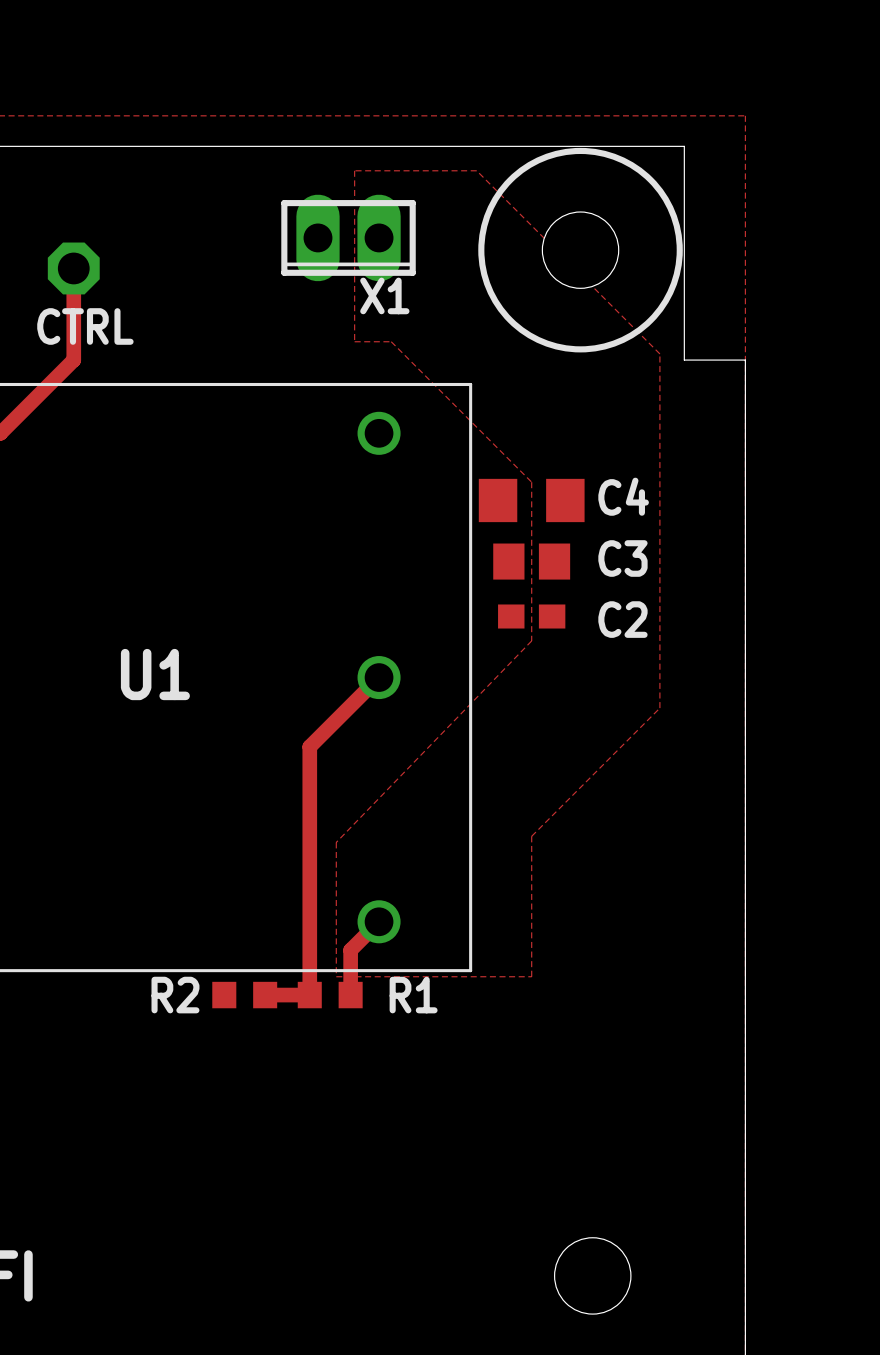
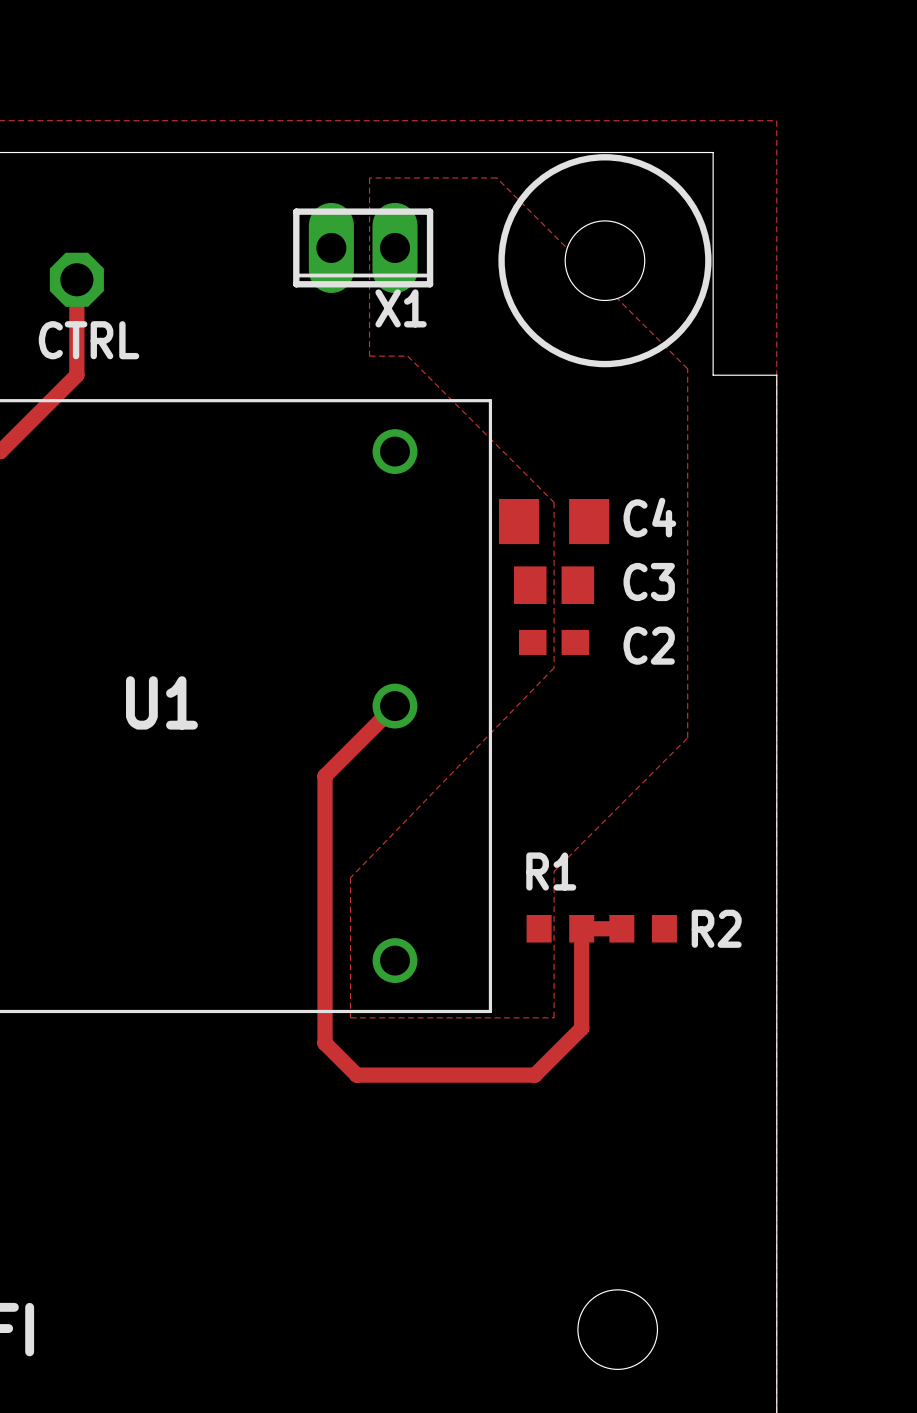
track: (311, 744) (309, 746) (309, 995) (265, 995) -> (325, 776) (325, 1043) (356, 1075) (534, 1075) (581, 1028) (581, 928) (621, 928)
track: (379, 921) (350, 950) (350, 995) -> none
R2 name position: R2 (175, 995) -> R2 (716, 928)
R2 position: (244, 995) -> (643, 928)
R1 position: (330, 995) -> (560, 928)
R1 name position: R1 (413, 995) -> R1 (551, 871)

